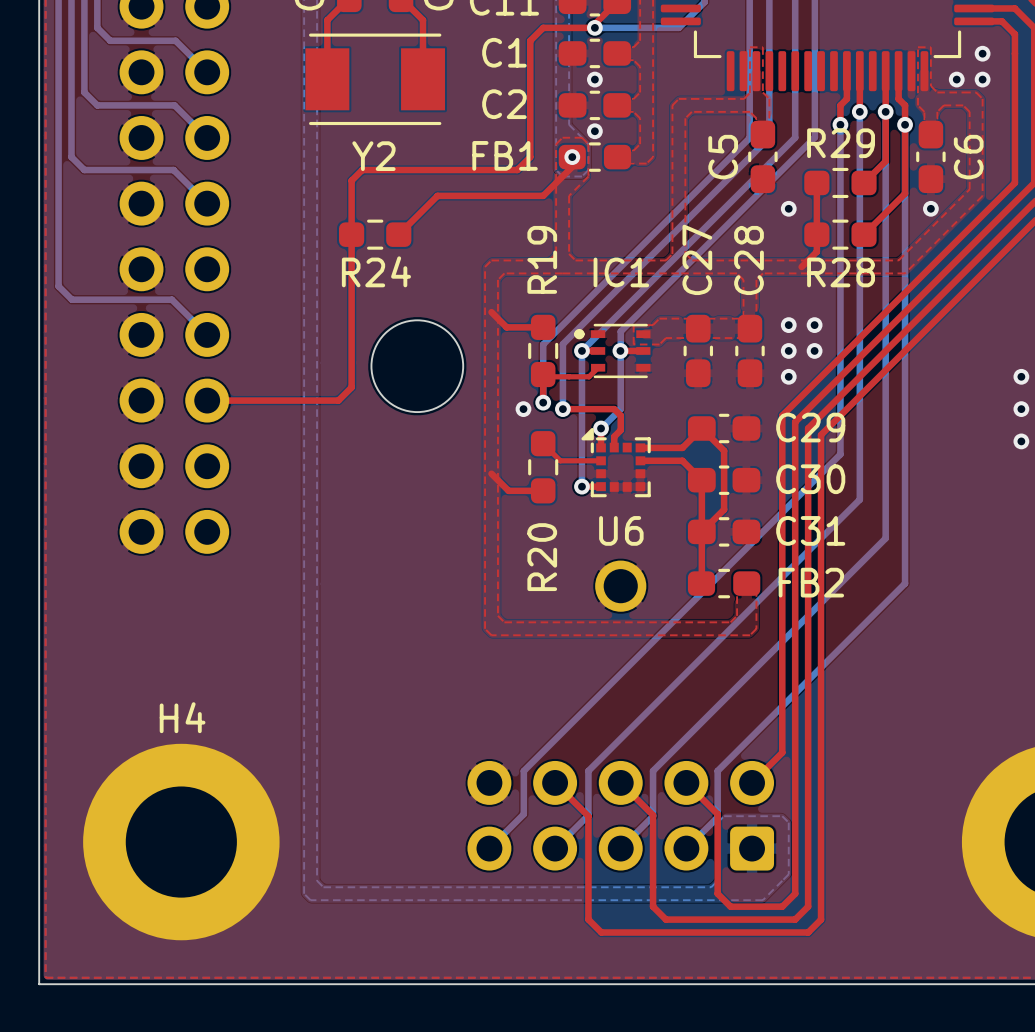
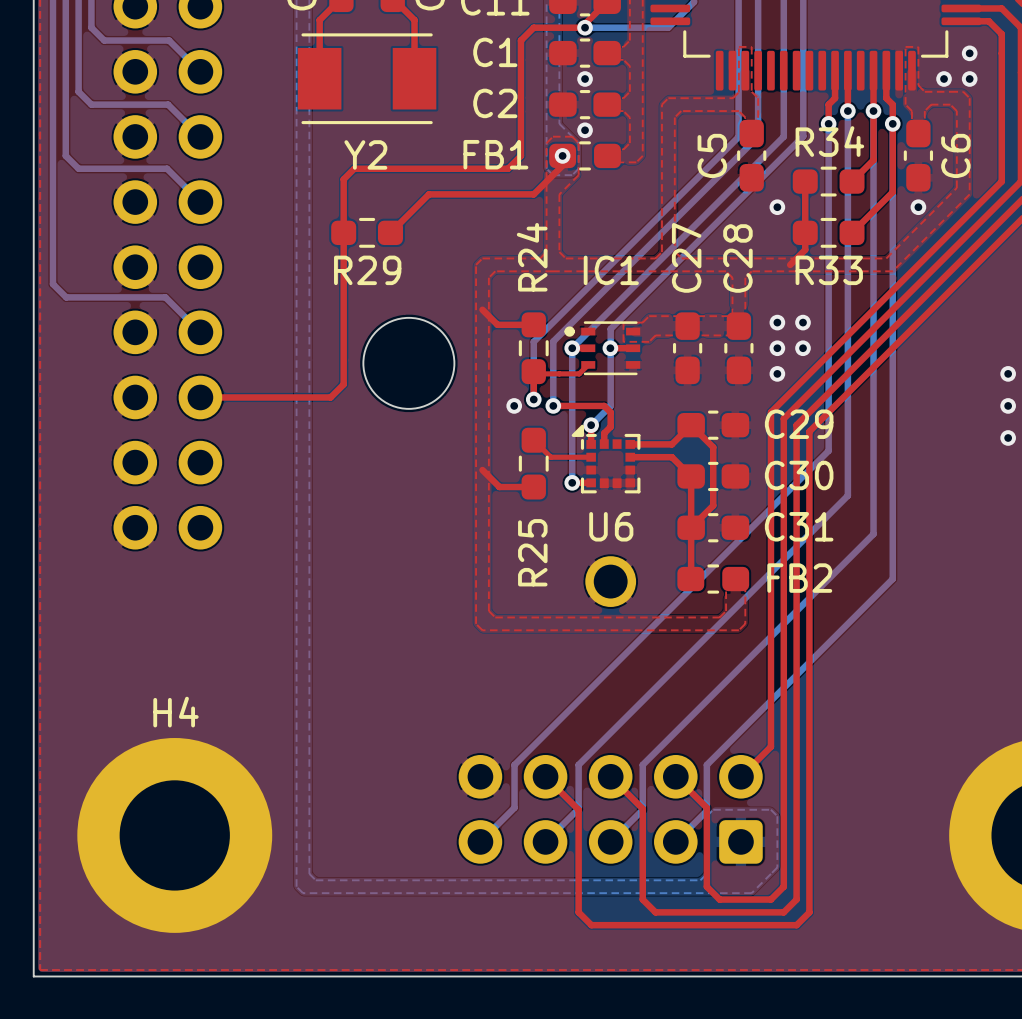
R29 name: R29 (841, 143) -> R34 (829, 141)
R19 name: R19 (542, 259) -> R24 (532, 257)
R24 name: R24 (376, 271) -> R29 (367, 270)
R28 name: R28 (841, 272) -> R33 (829, 270)
R20 name: R20 (542, 557) -> R25 (532, 552)

